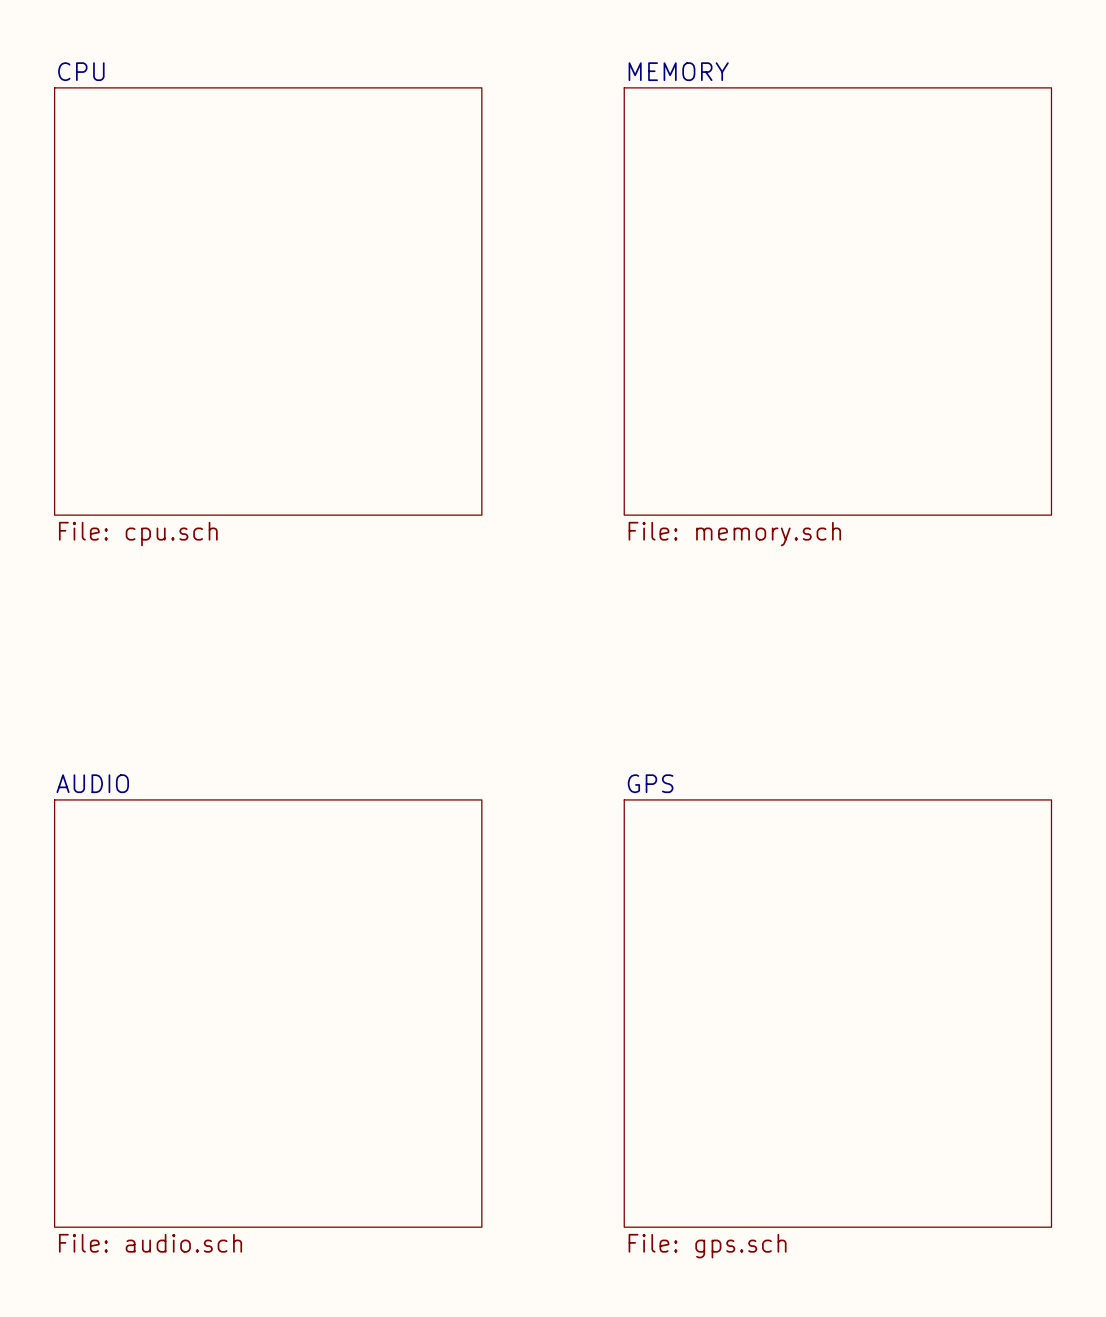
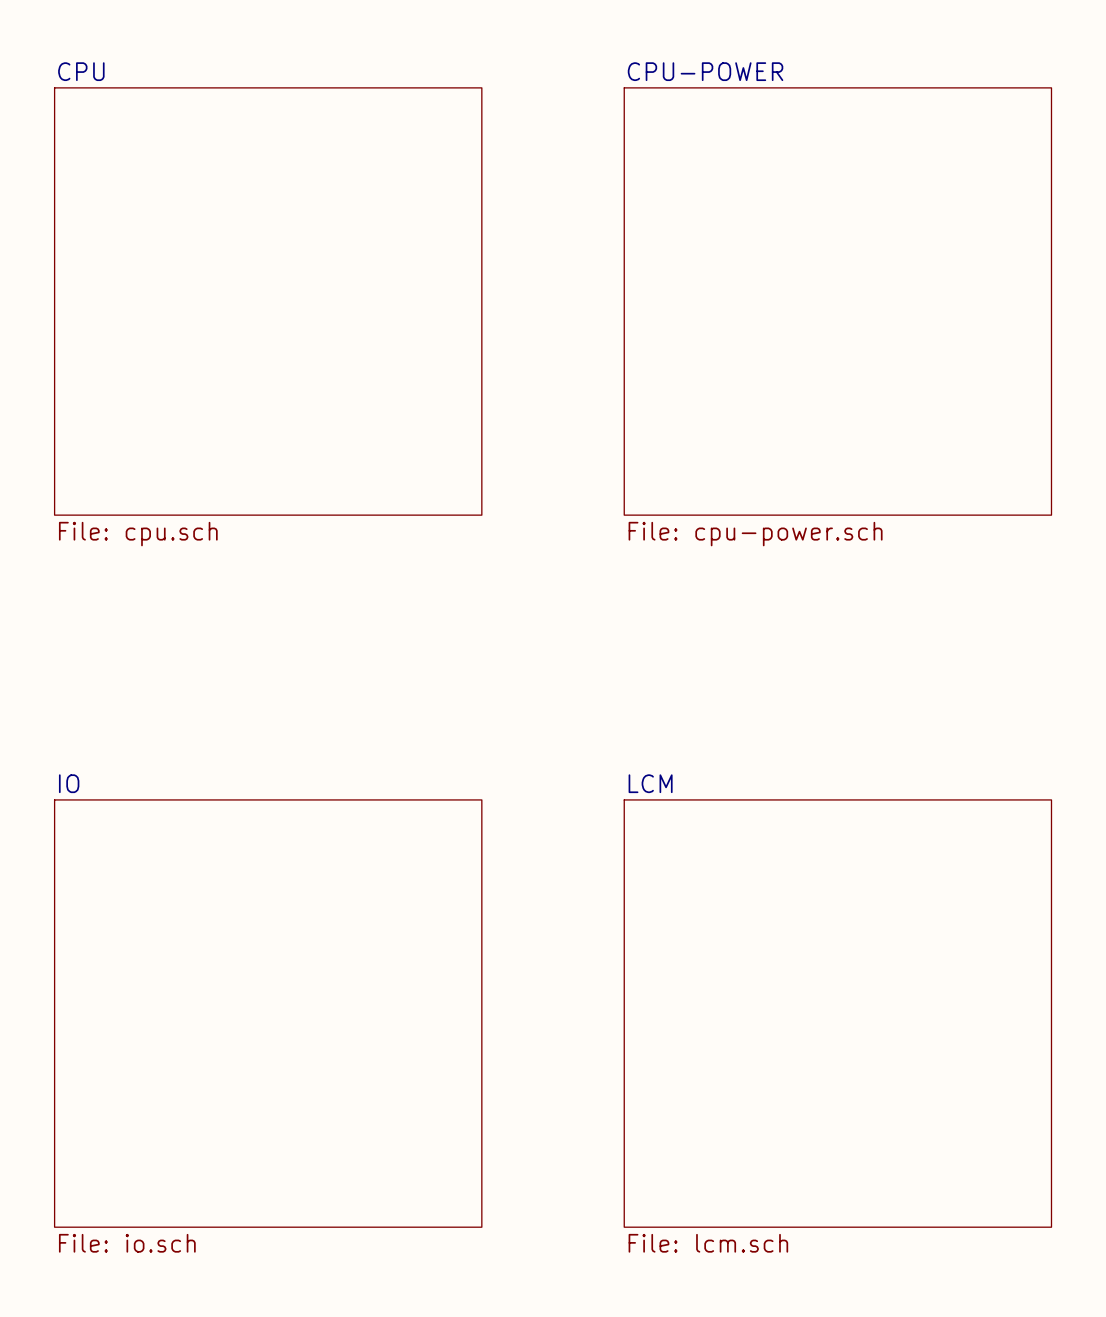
sheet MEMORY name: MEMORY (678, 71) -> CPU-POWER (705, 71)
sheet MEMORY value: File: memory.sch (734, 534) -> File: cpu-power.sch (755, 534)
sheet AUDIO name: AUDIO (92, 783) -> IO (69, 783)
sheet GPS name: GPS (650, 783) -> LCM (650, 783)
sheet AUDIO value: File: audio.sch (150, 1243) -> File: io.sch (127, 1243)
sheet GPS value: File: gps.sch (707, 1246) -> File: lcm.sch (708, 1243)

